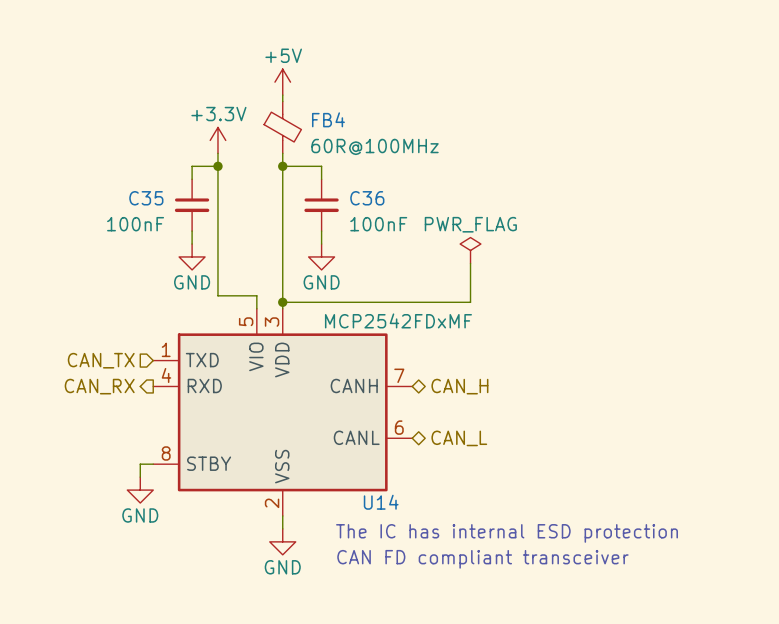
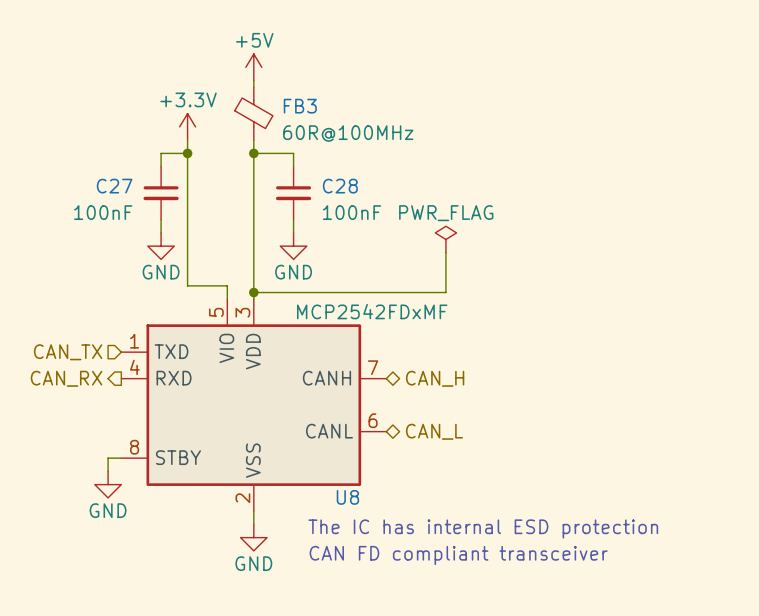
FB4 name: FB4 (328, 119) -> FB3 (300, 106)
C35 name: C35 (146, 198) -> C27 (114, 186)
C36 name: C36 (367, 198) -> C28 (340, 186)
U14 name: U14 (381, 502) -> U8 (347, 497)

